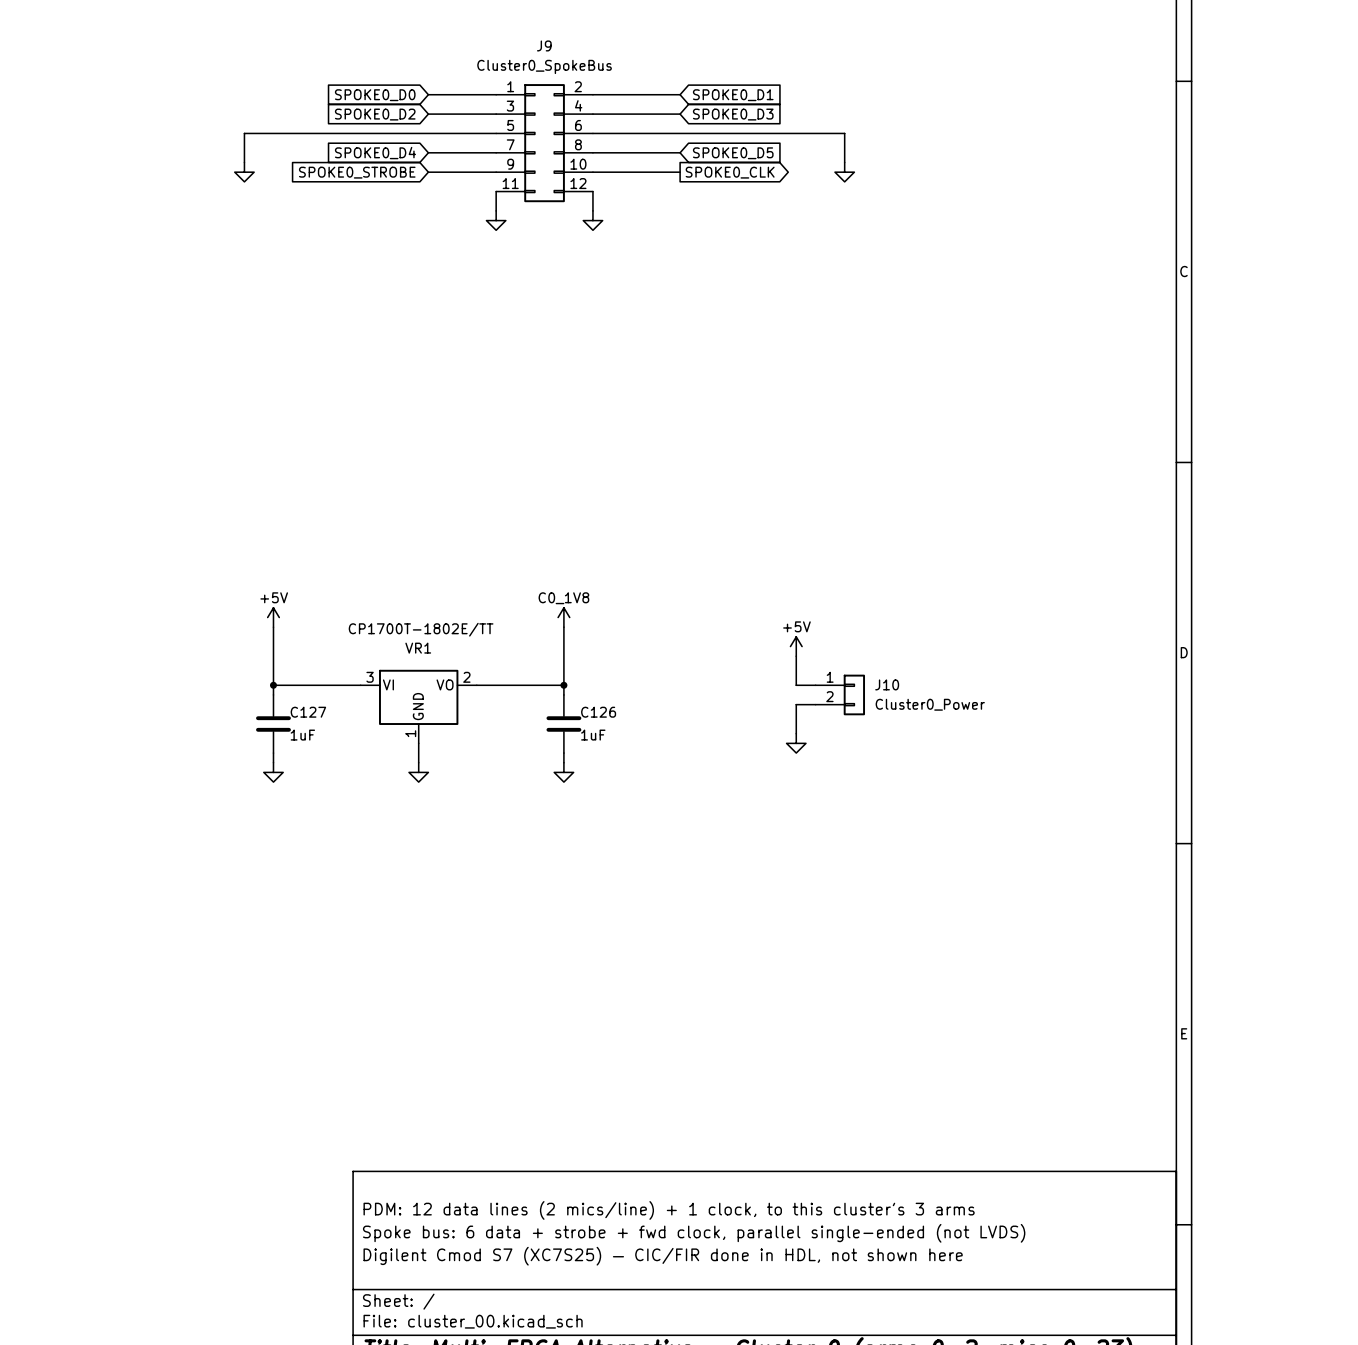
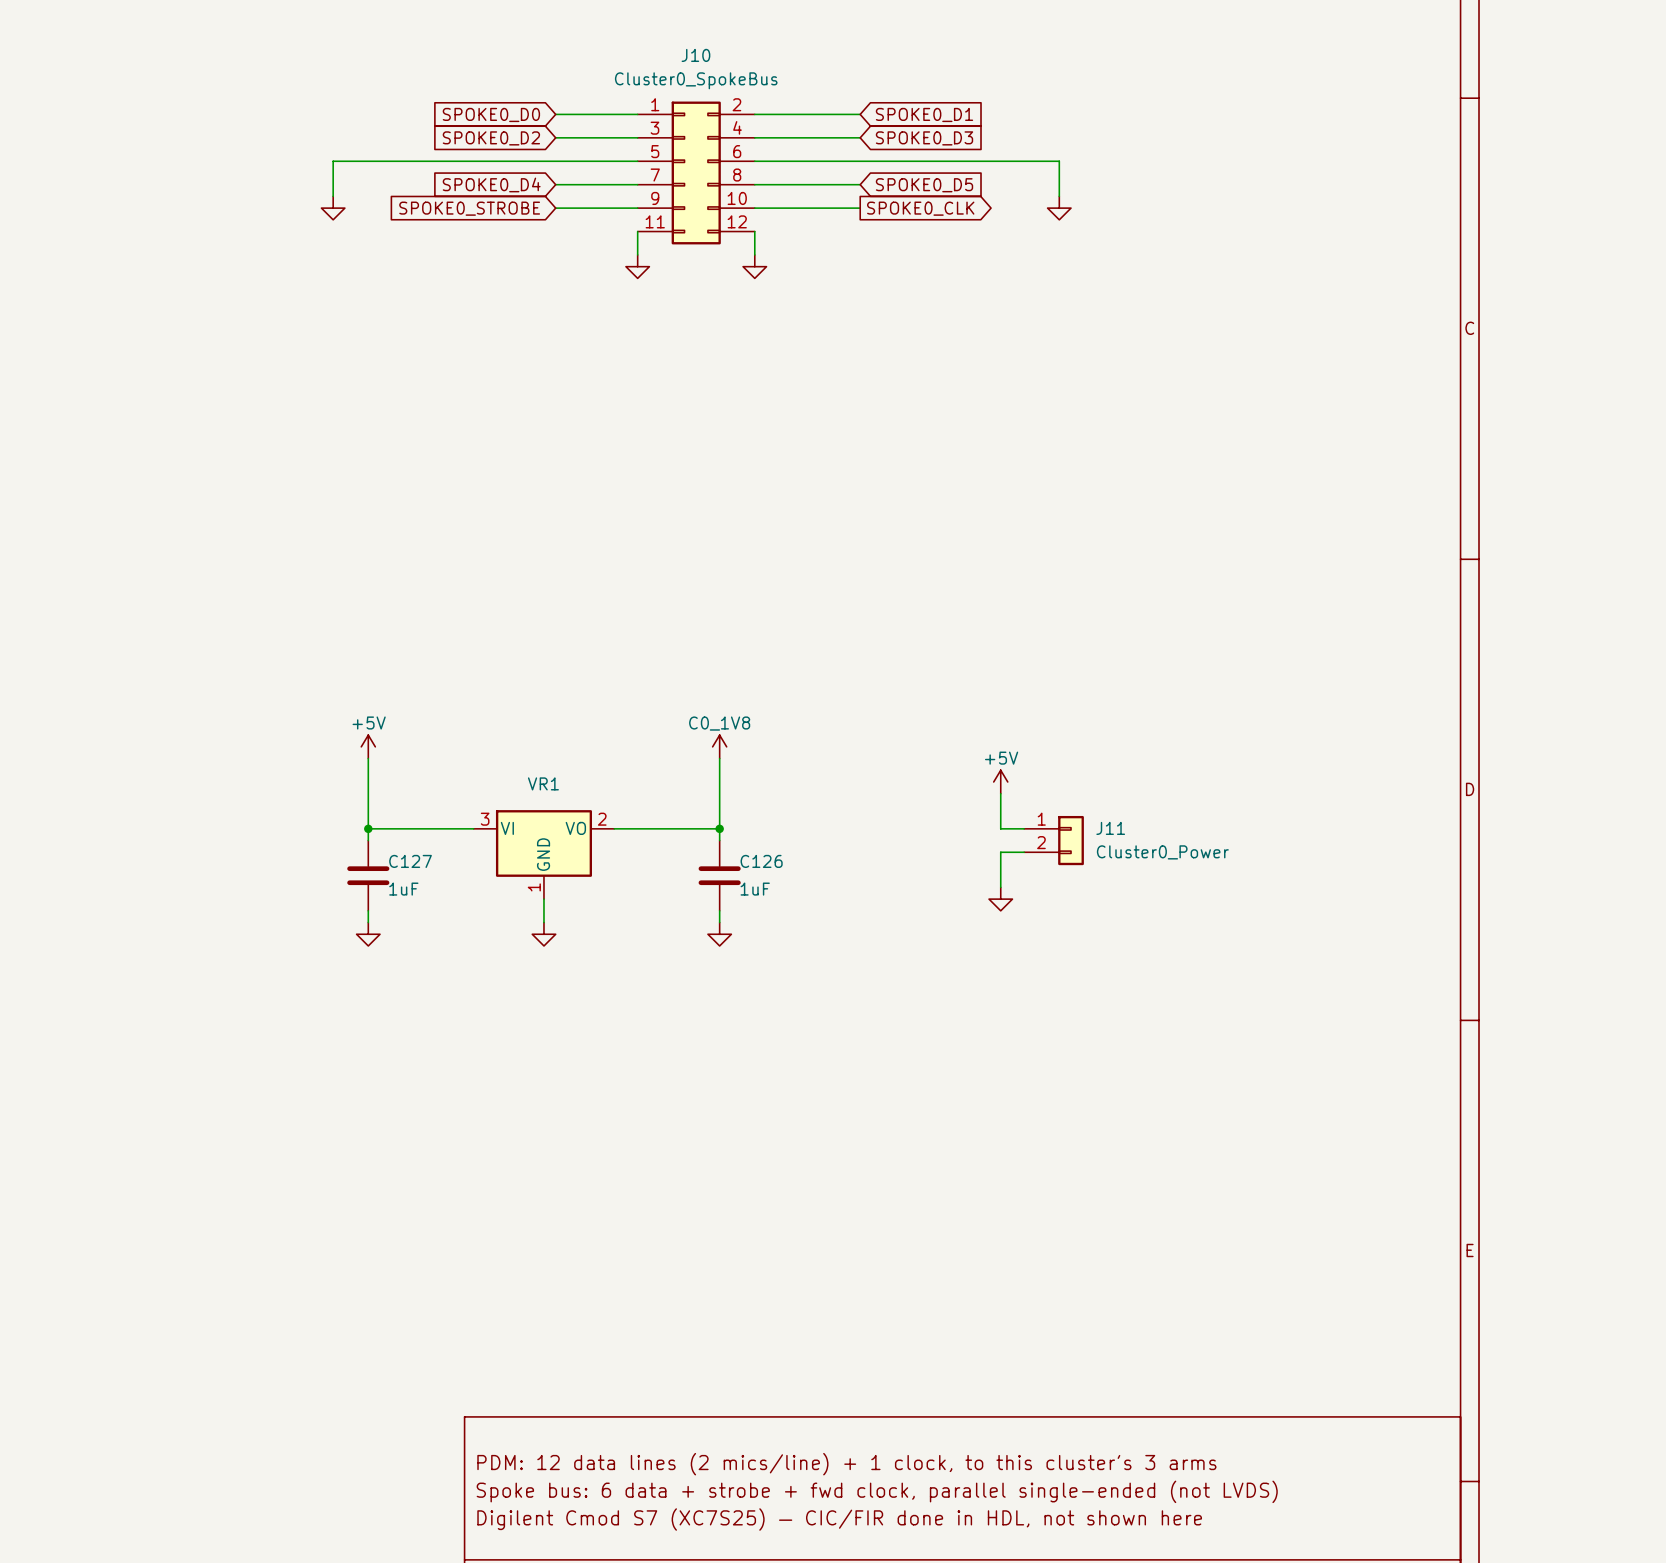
J9 name: J9 (544, 45) -> J10 (695, 55)
VR1 value: CP1700T-1802E/TT (421, 629) -> none
J10 name: J10 (887, 684) -> J11 (1110, 828)

